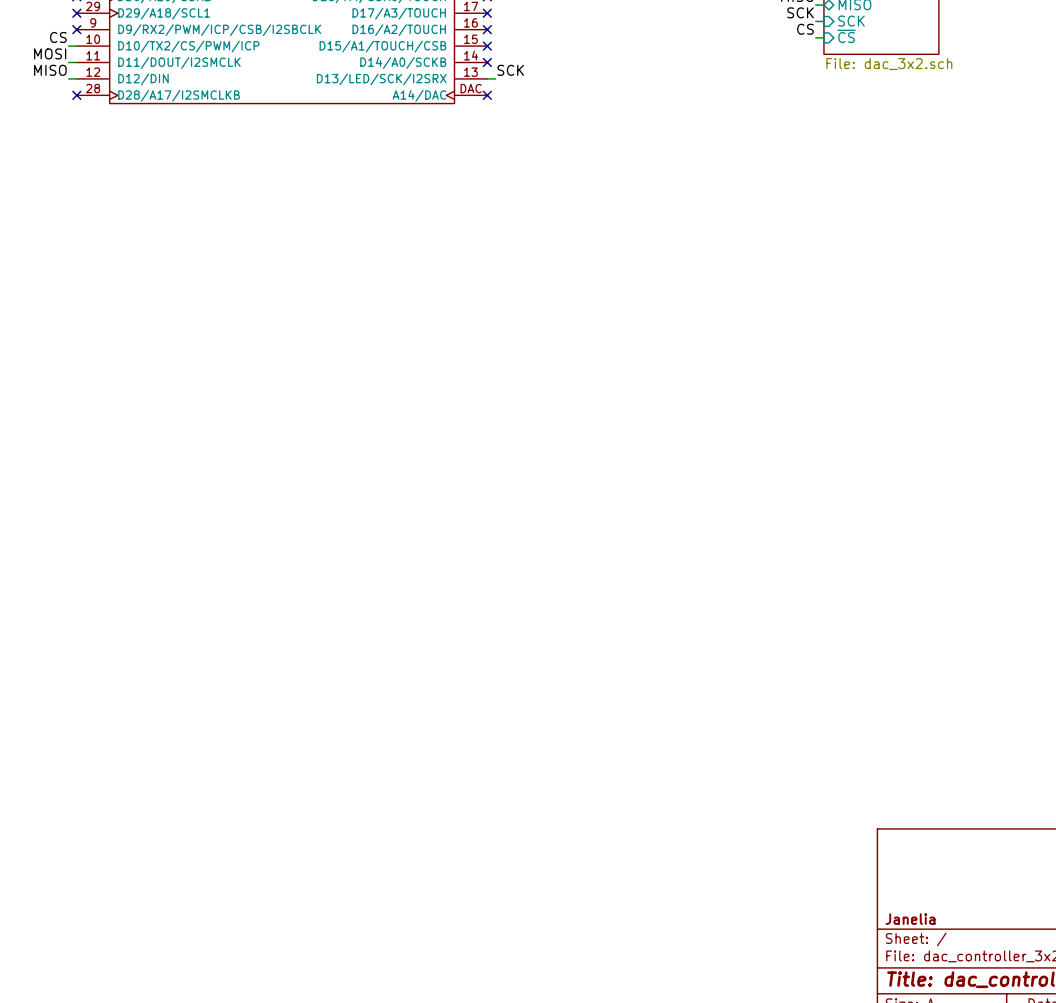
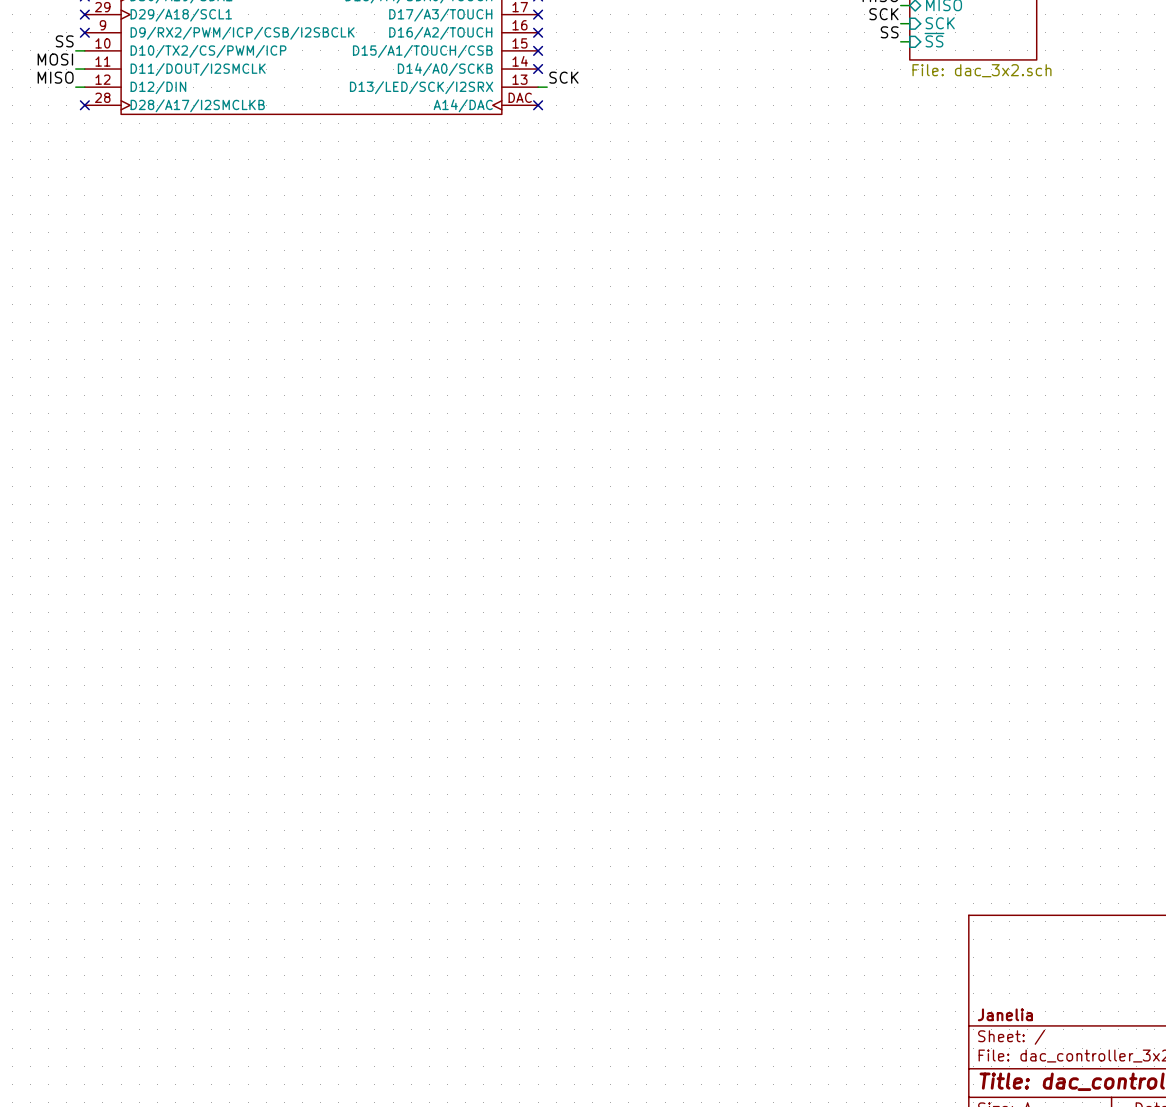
label: CS (805, 29) -> SS (889, 32)
sheet pin: ~{CS} (846, 36) -> ~{SS} (934, 40)
label: CS (58, 37) -> SS (64, 41)

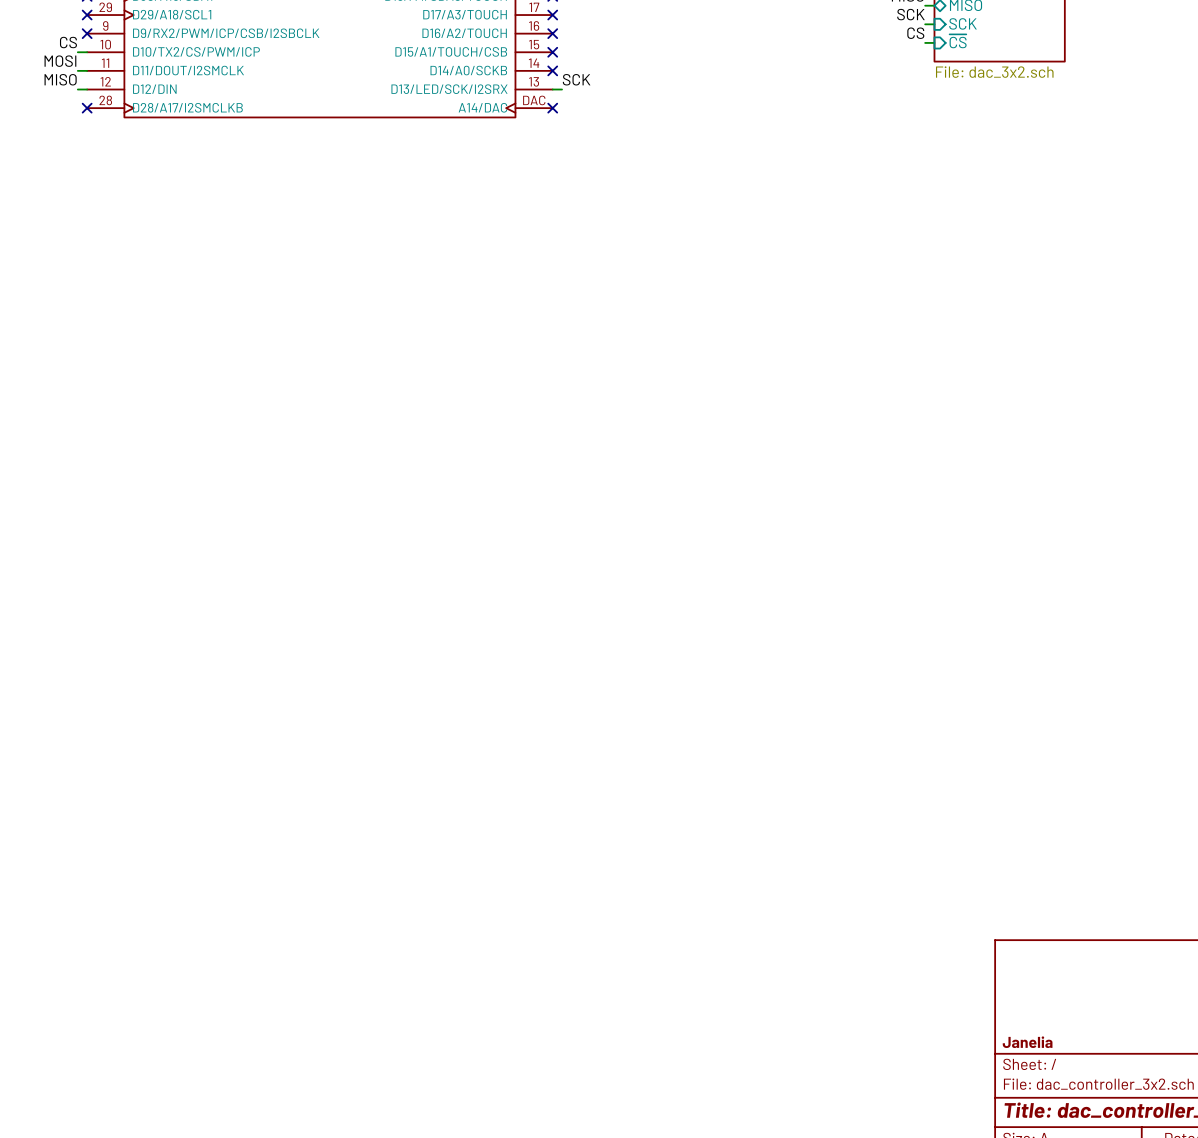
label: SS (889, 32) -> CS (915, 33)
sheet pin: ~{SS} (934, 40) -> ~{CS} (958, 41)
label: SS (64, 41) -> CS (68, 42)

